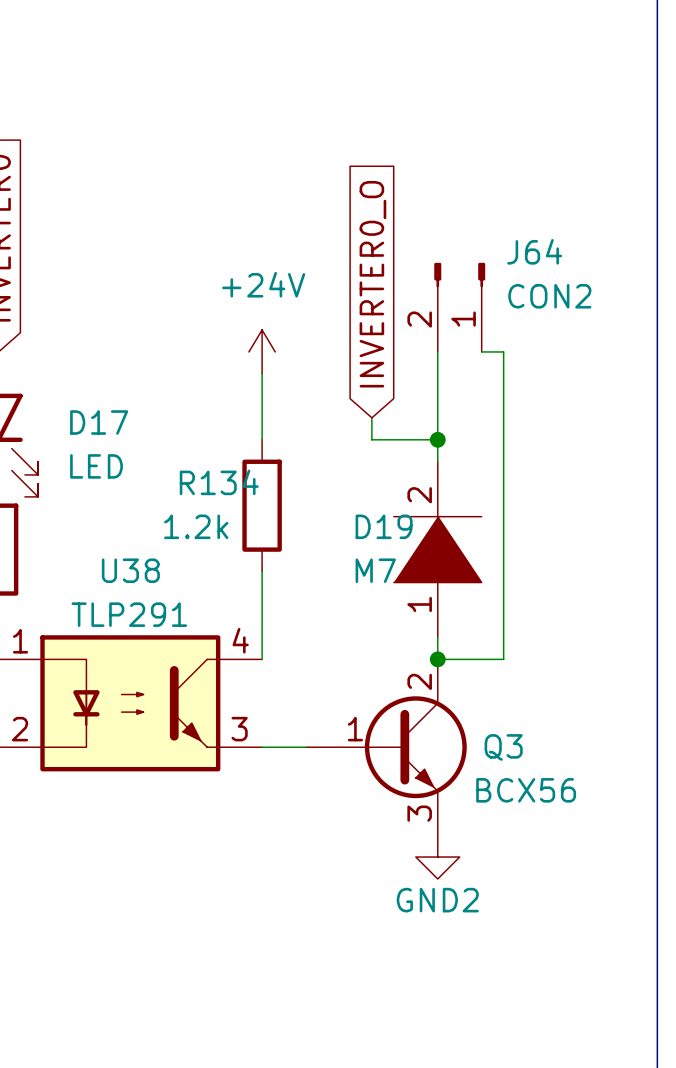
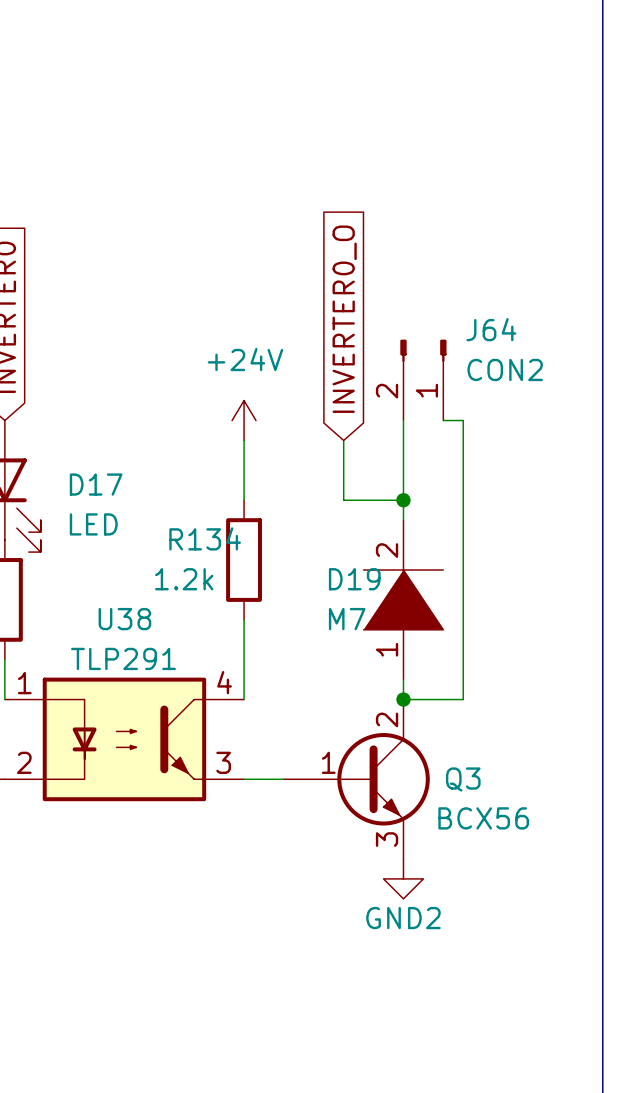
global label position: INVERTER0_O (372, 284) -> INVERTER0_O (344, 319)
wire: none -> (343, 440) (343, 480)

